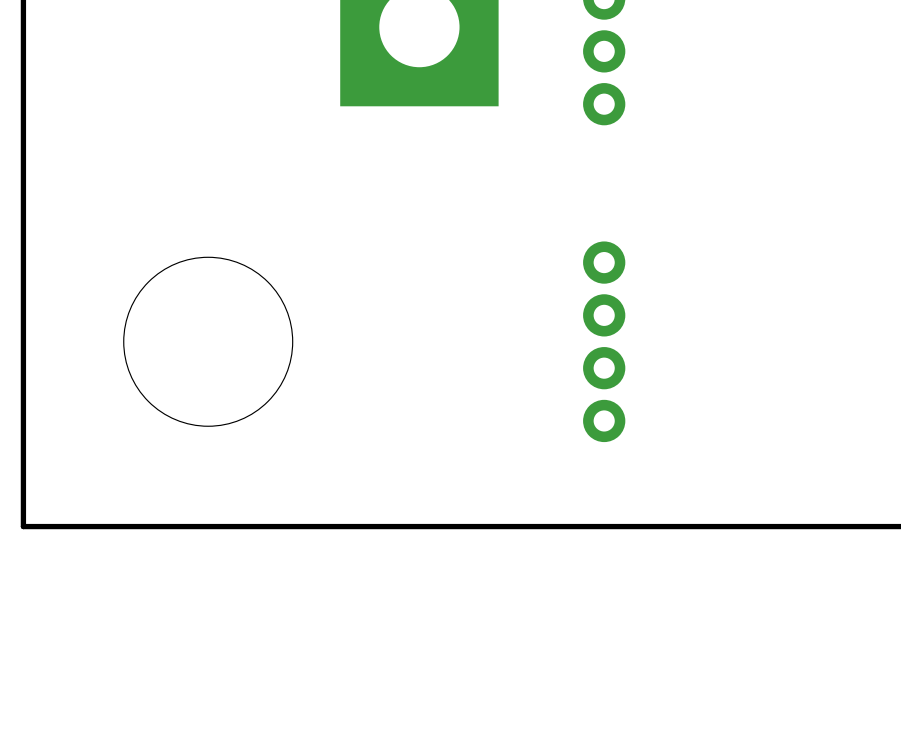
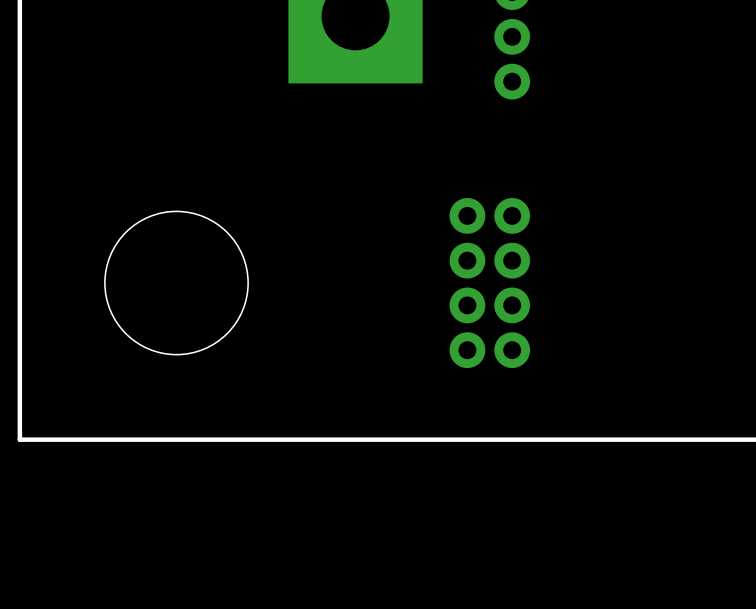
via: none -> (467, 215)
via: none -> (467, 260)
via: none -> (467, 305)
via: none -> (467, 350)

